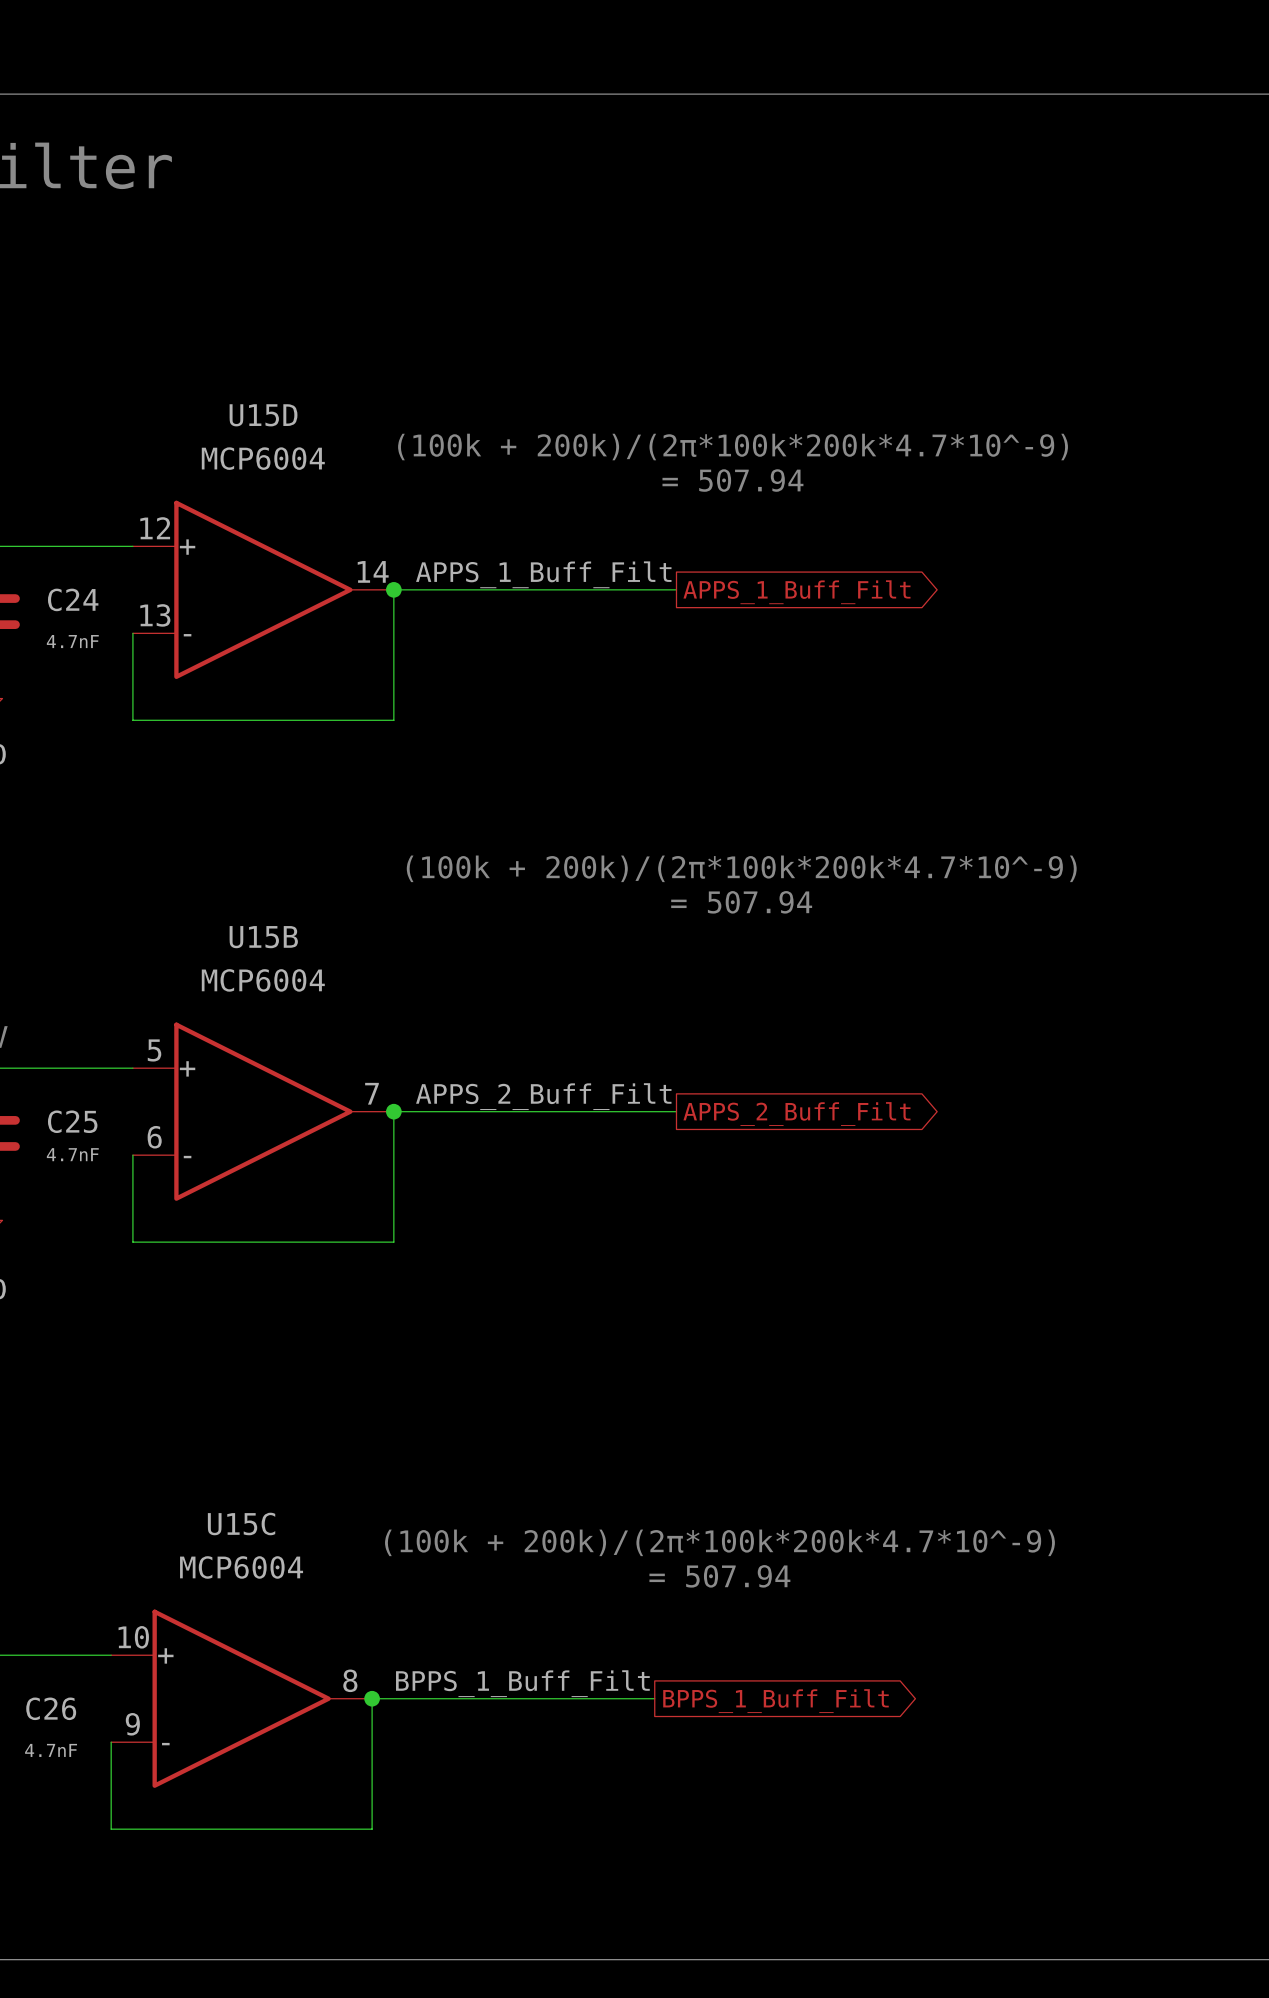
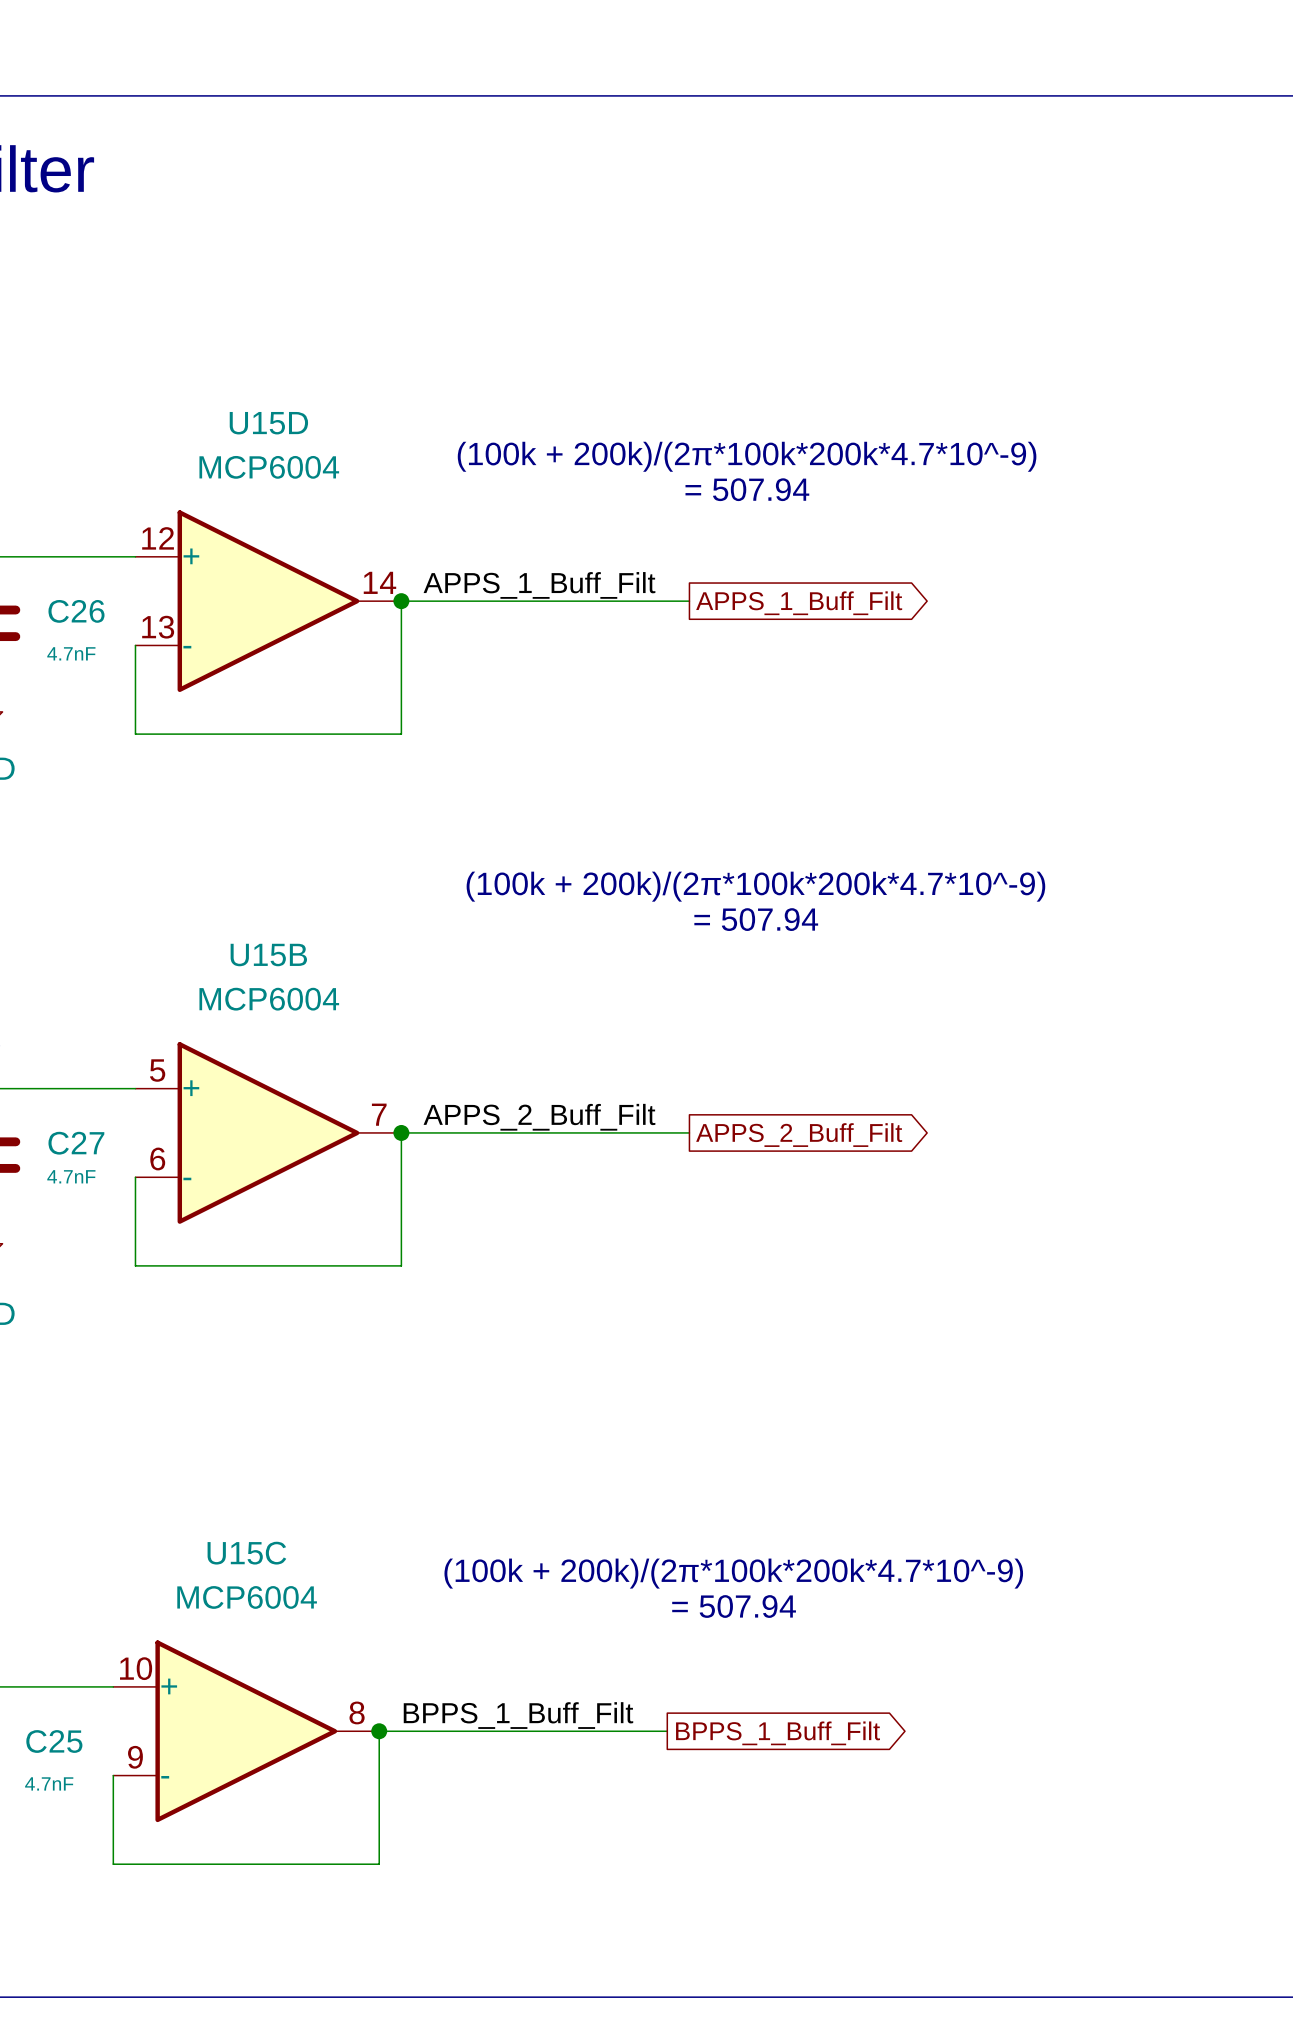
C24 name: C24 (73, 599) -> C26 (76, 611)
C25 name: C25 (72, 1121) -> C27 (76, 1143)
C26 name: C26 (51, 1708) -> C25 (54, 1741)

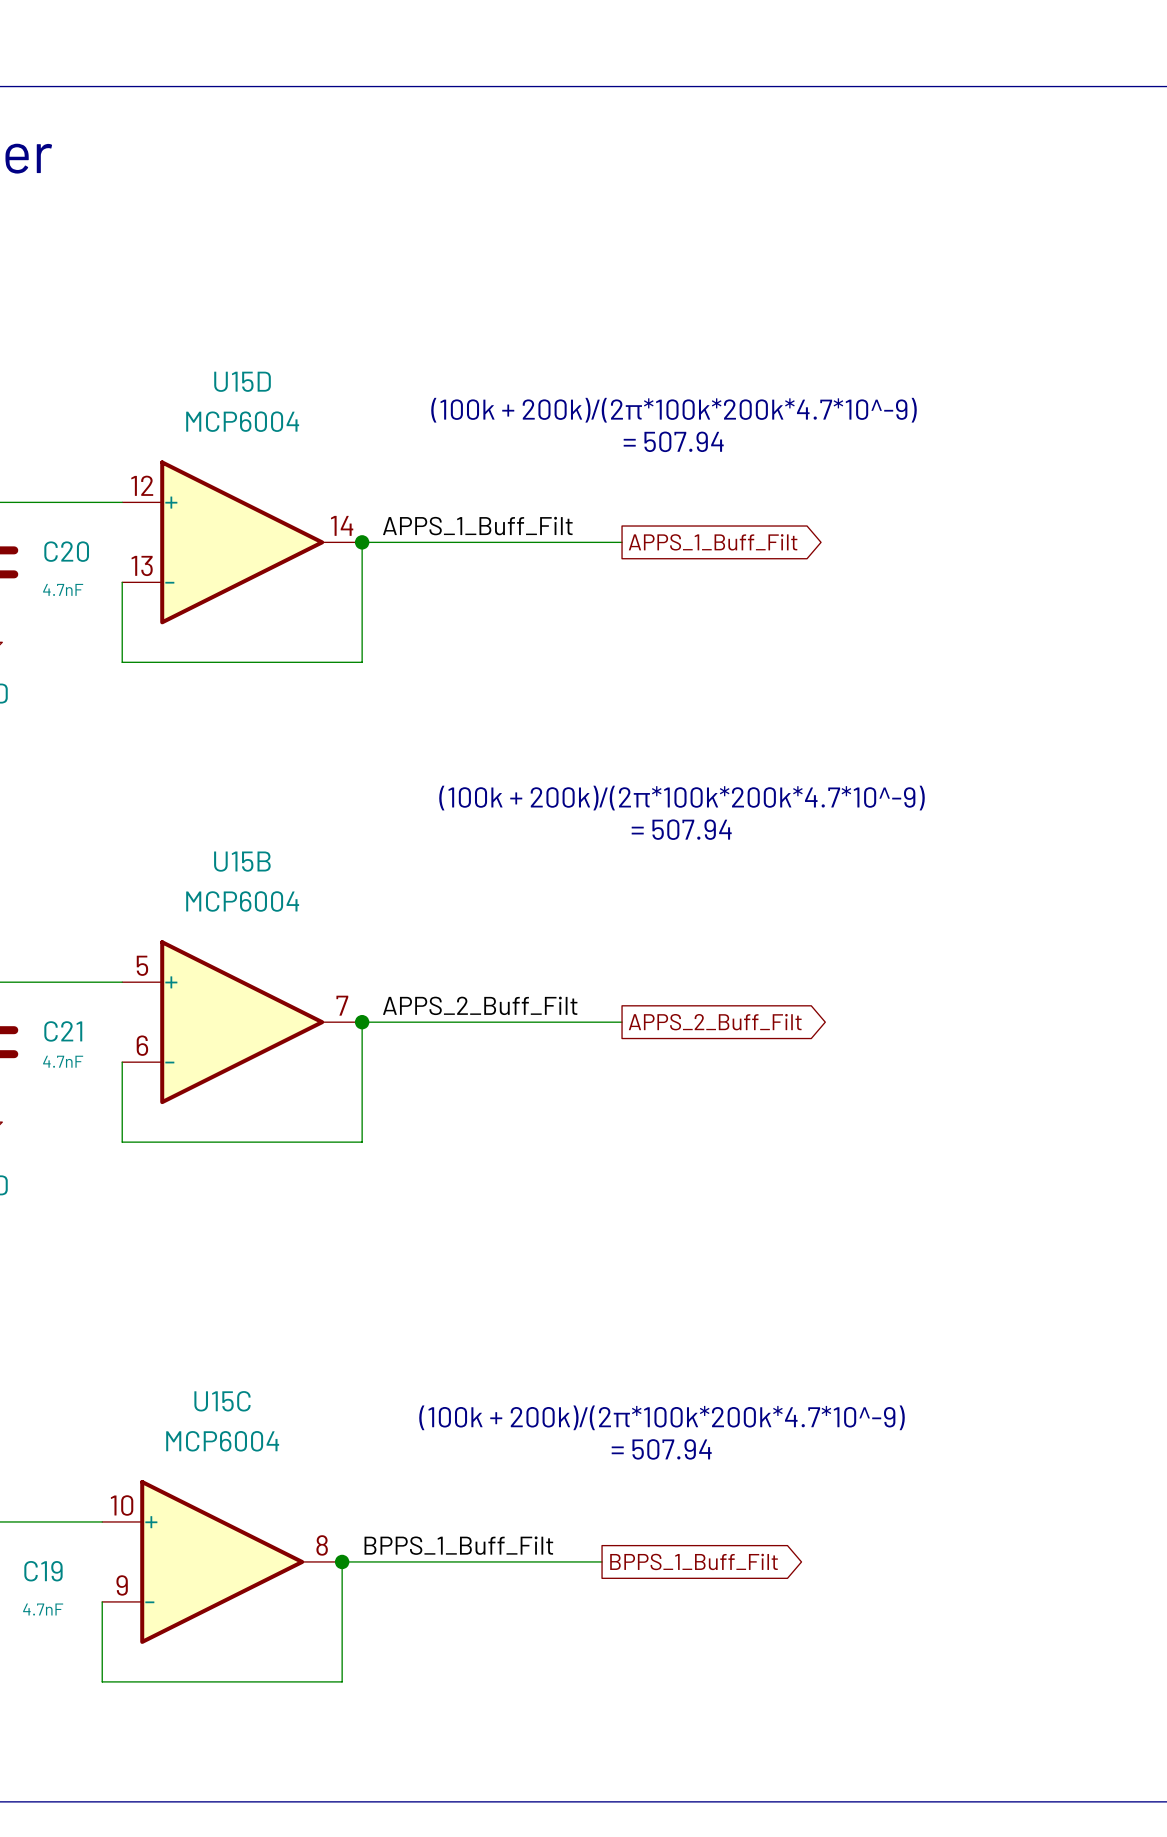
C26 name: C26 (76, 611) -> C20 (66, 551)
C27 name: C27 (76, 1143) -> C21 (63, 1031)
C25 name: C25 (54, 1741) -> C19 (43, 1571)

